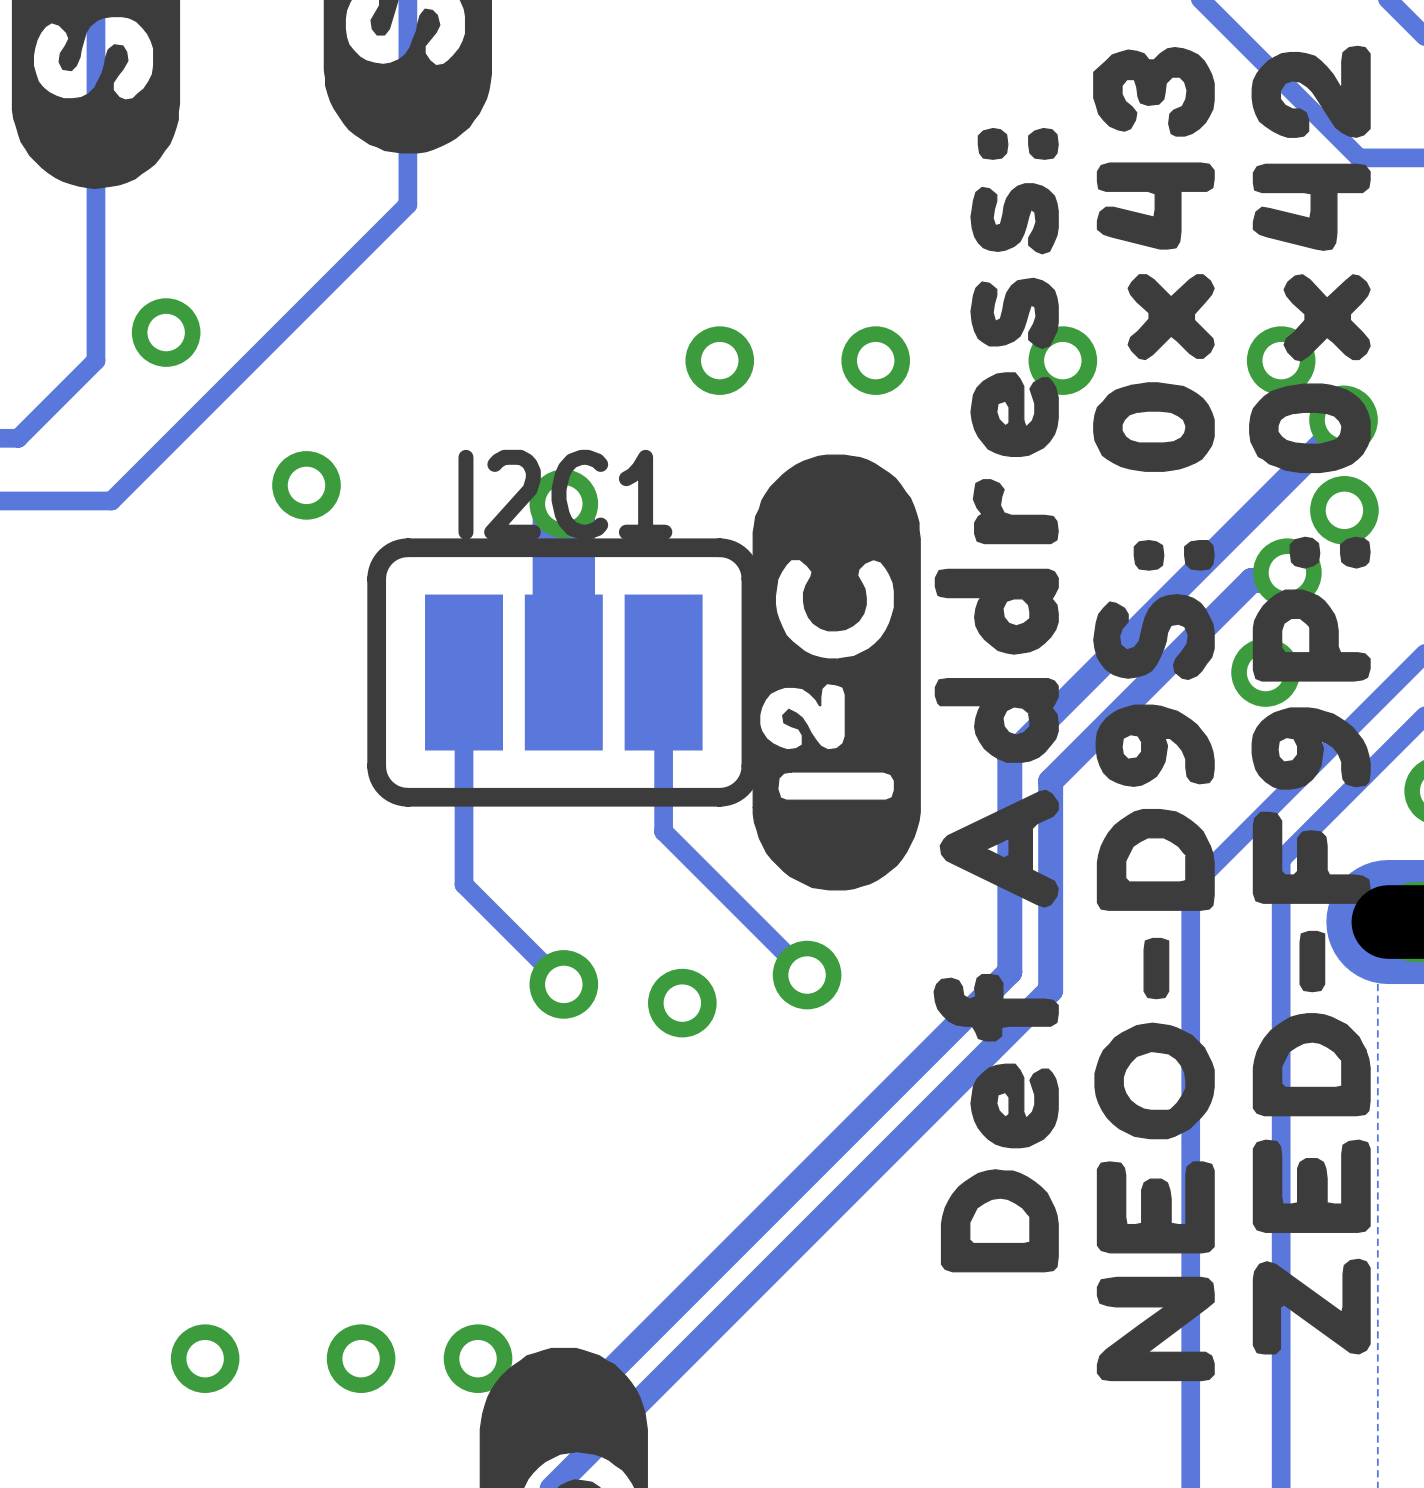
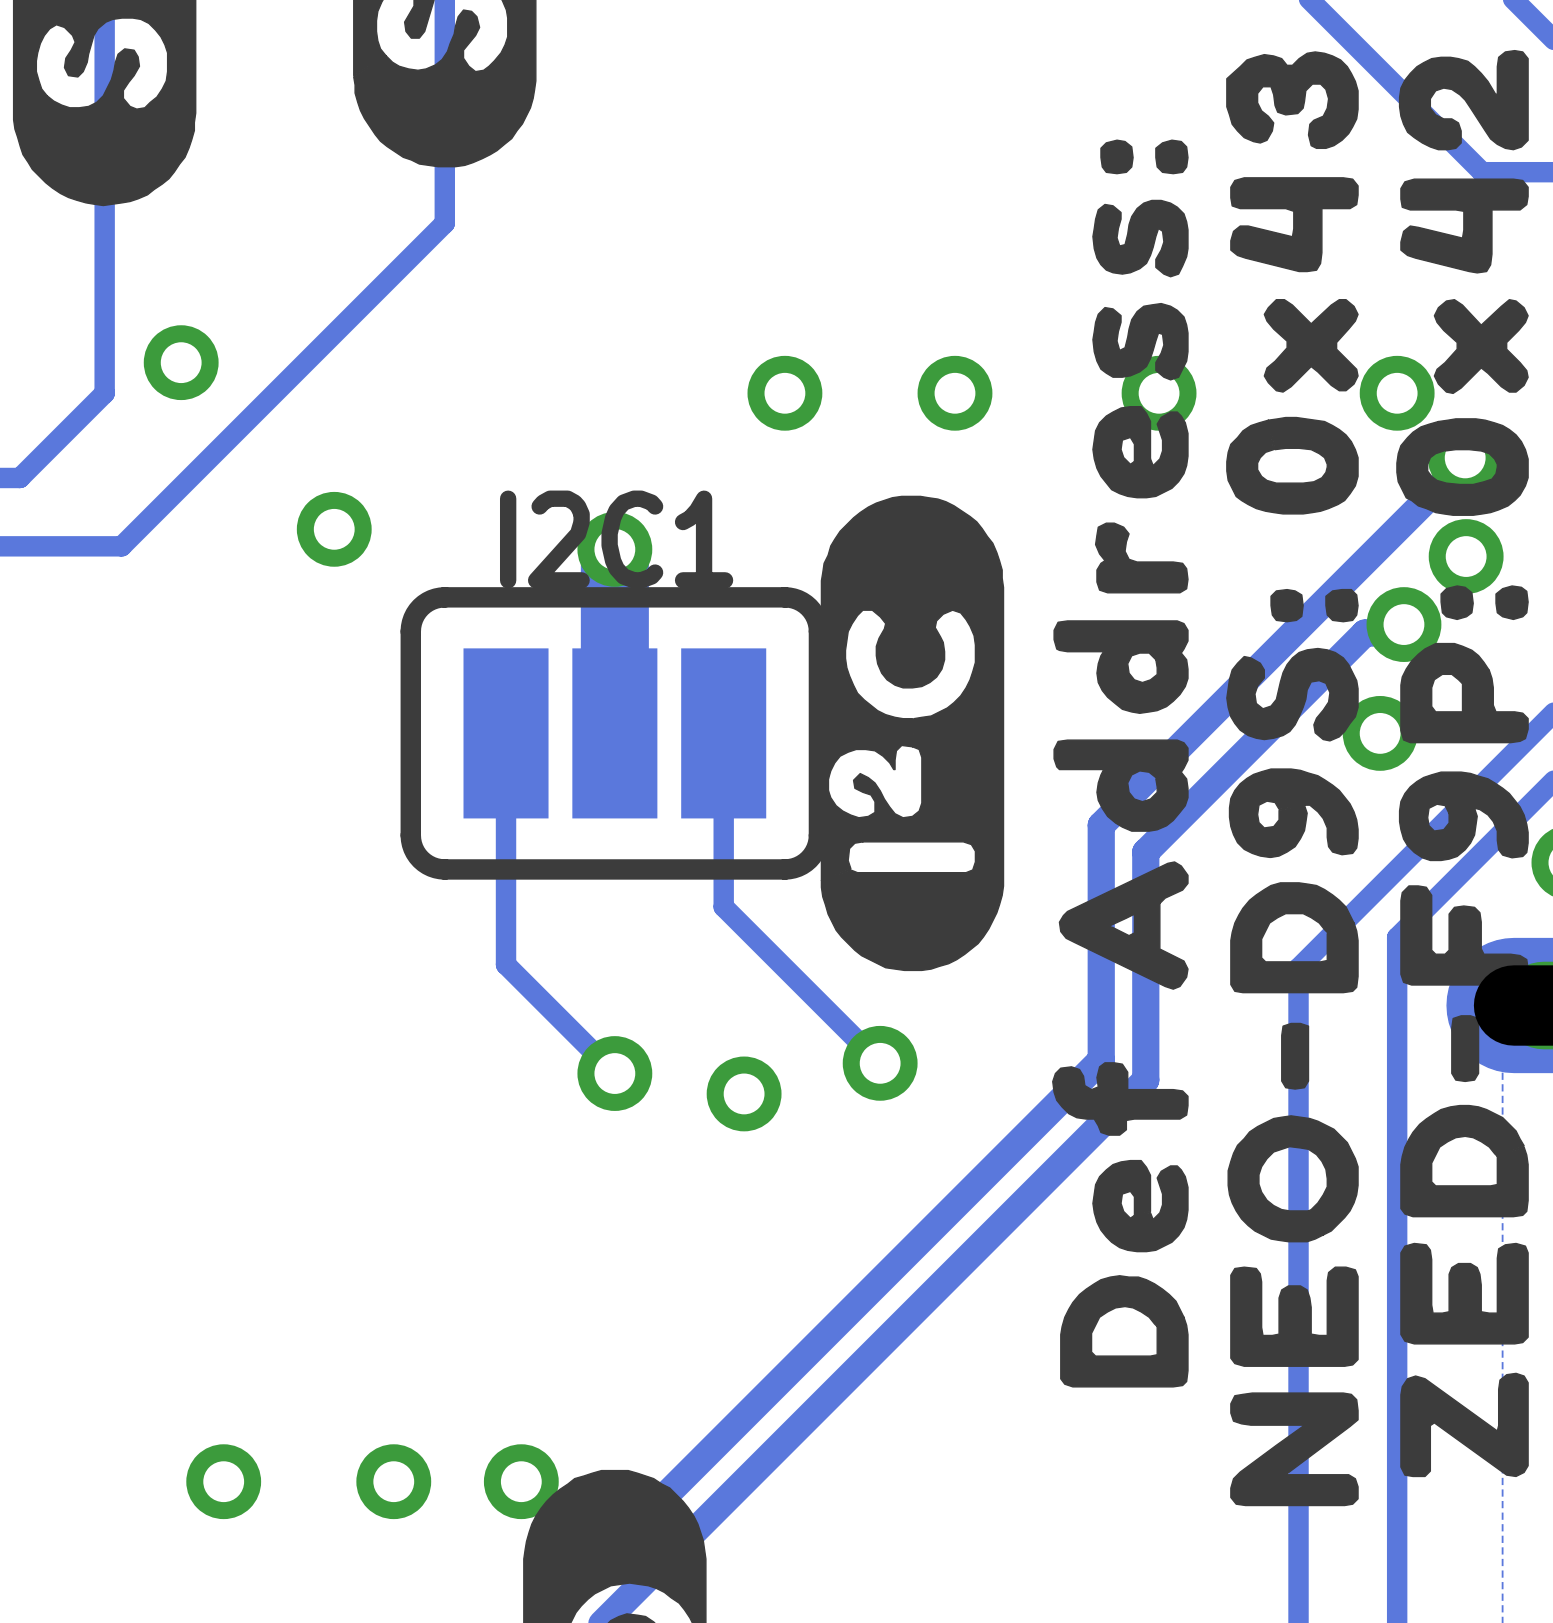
drawing position: (1153, 259) -> (1292, 282)
drawing position: (1309, 259) -> (1462, 282)
drawing position: (996, 700) -> (1120, 763)
drawing position: (1311, 945) -> (1463, 1031)
drawing position: (1153, 960) -> (1292, 1047)

